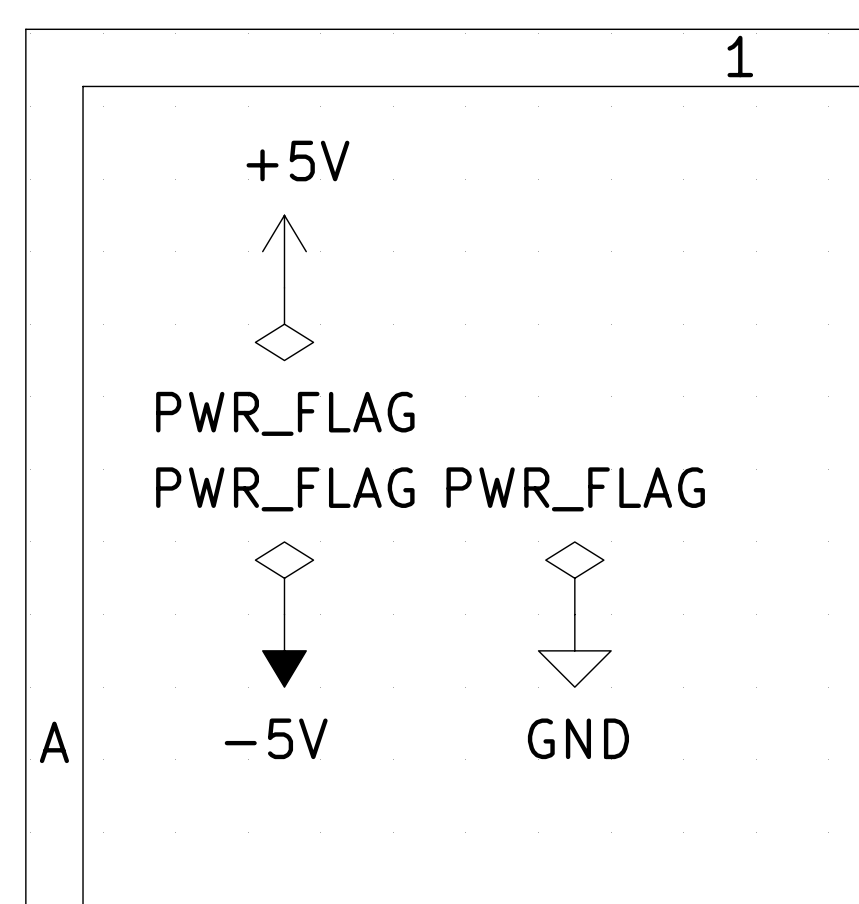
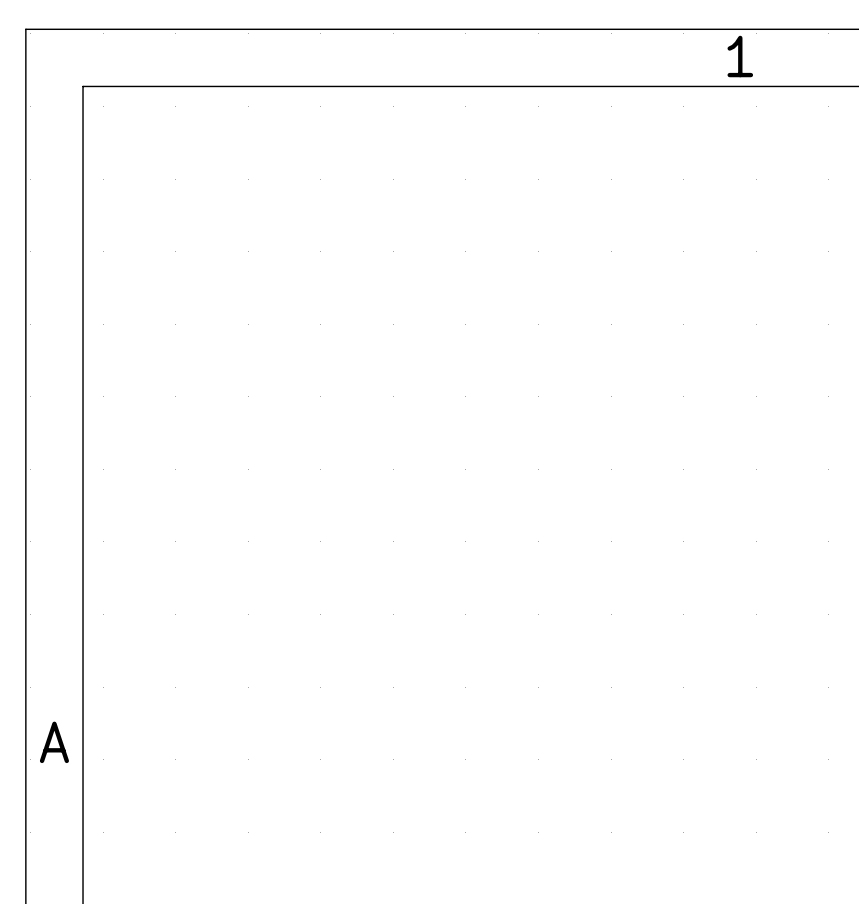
power symbol: +5V (284, 251) -> none
power symbol: PWR_FLAG (284, 324) -> none
power symbol: PWR_FLAG (284, 578) -> none
power symbol: PWR_FLAG (574, 578) -> none
power symbol: -5V (284, 650) -> none
power symbol: GND (574, 650) -> none

